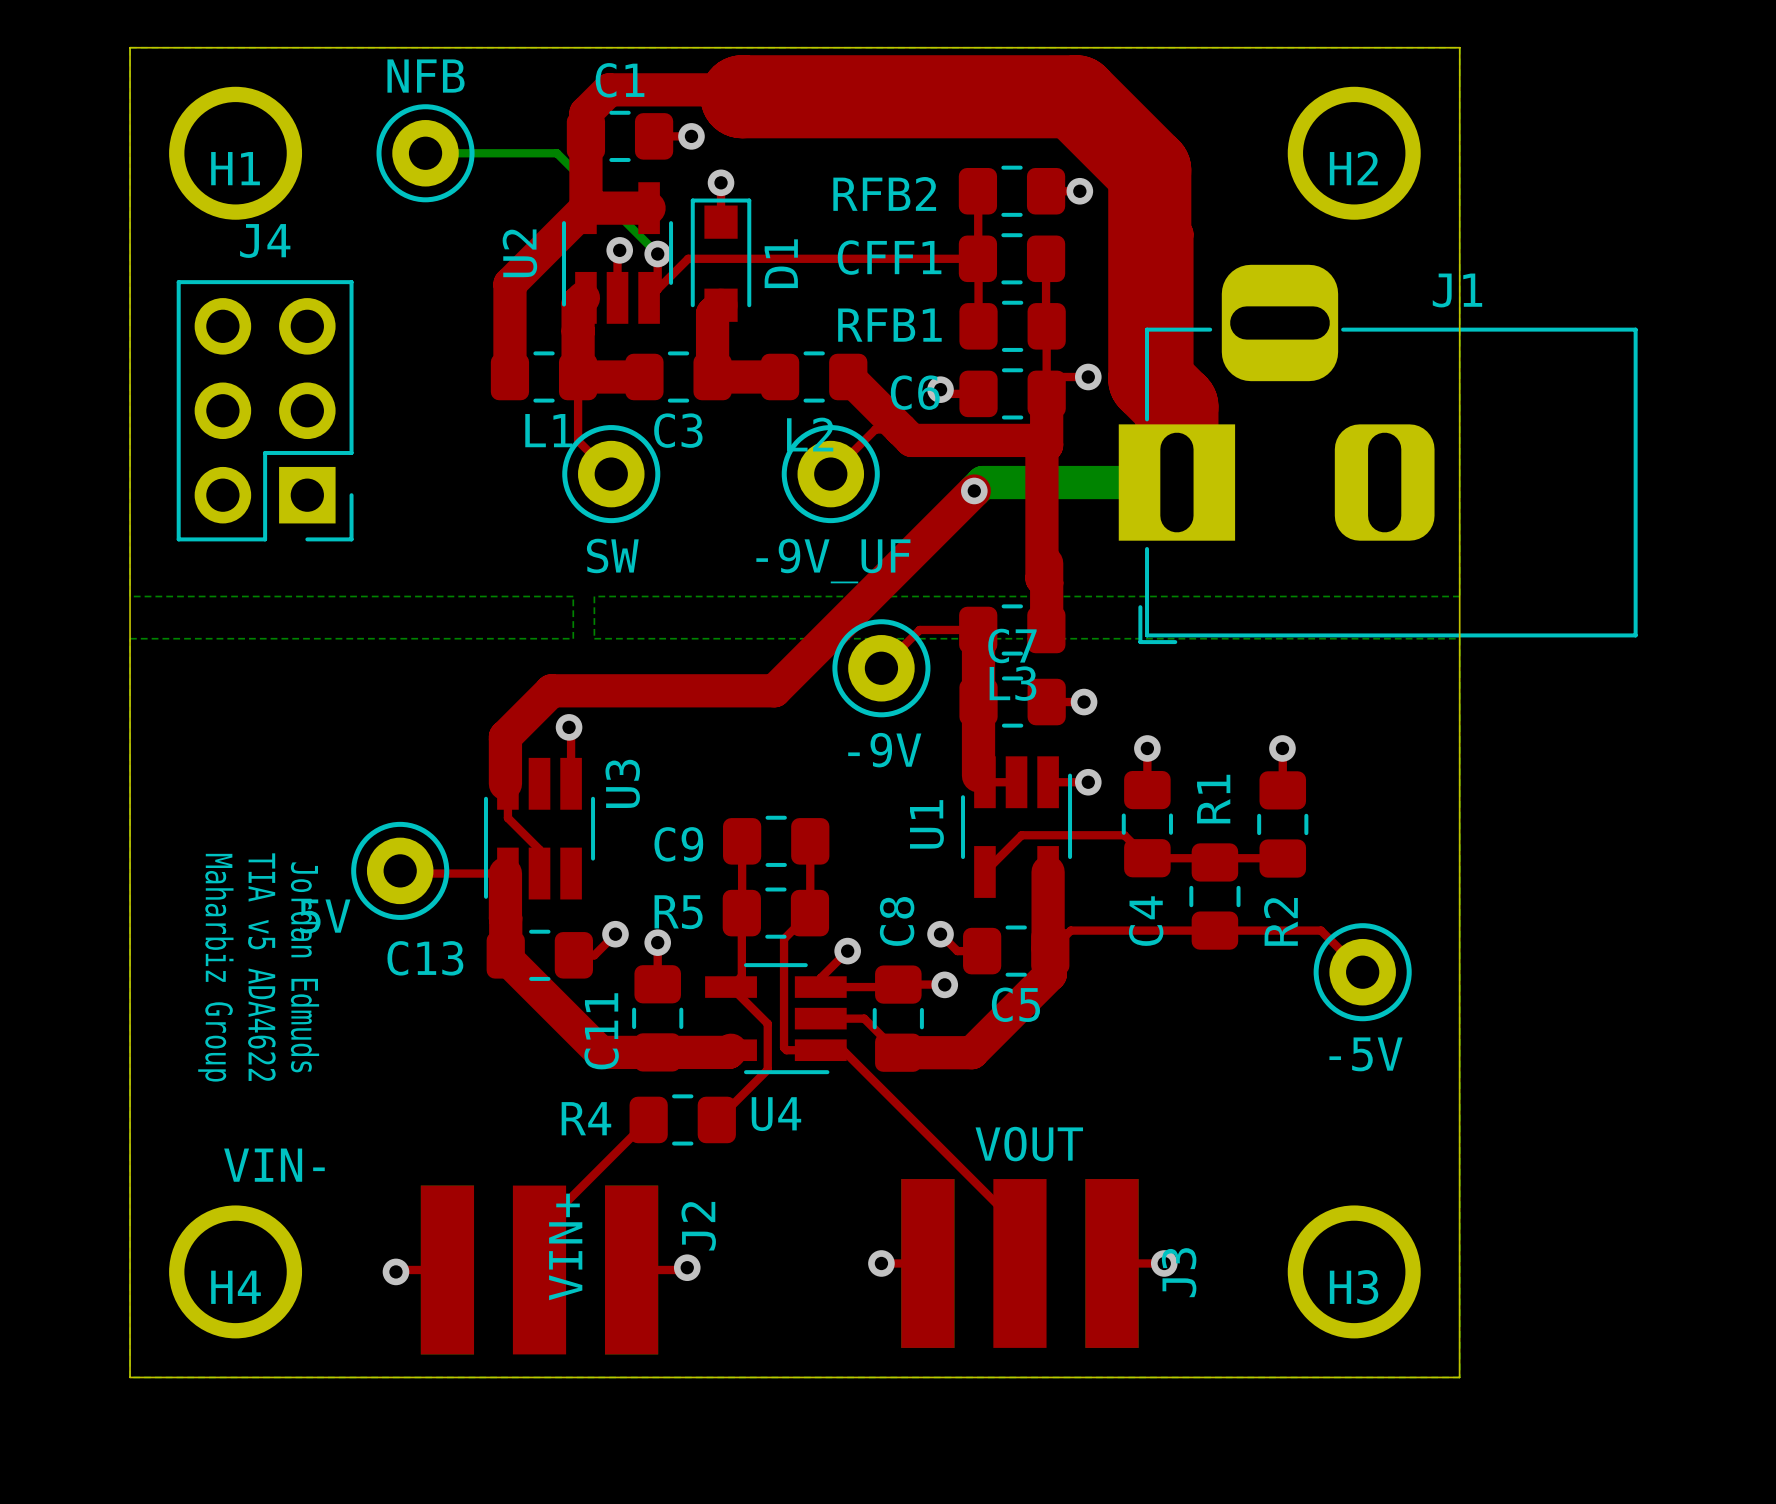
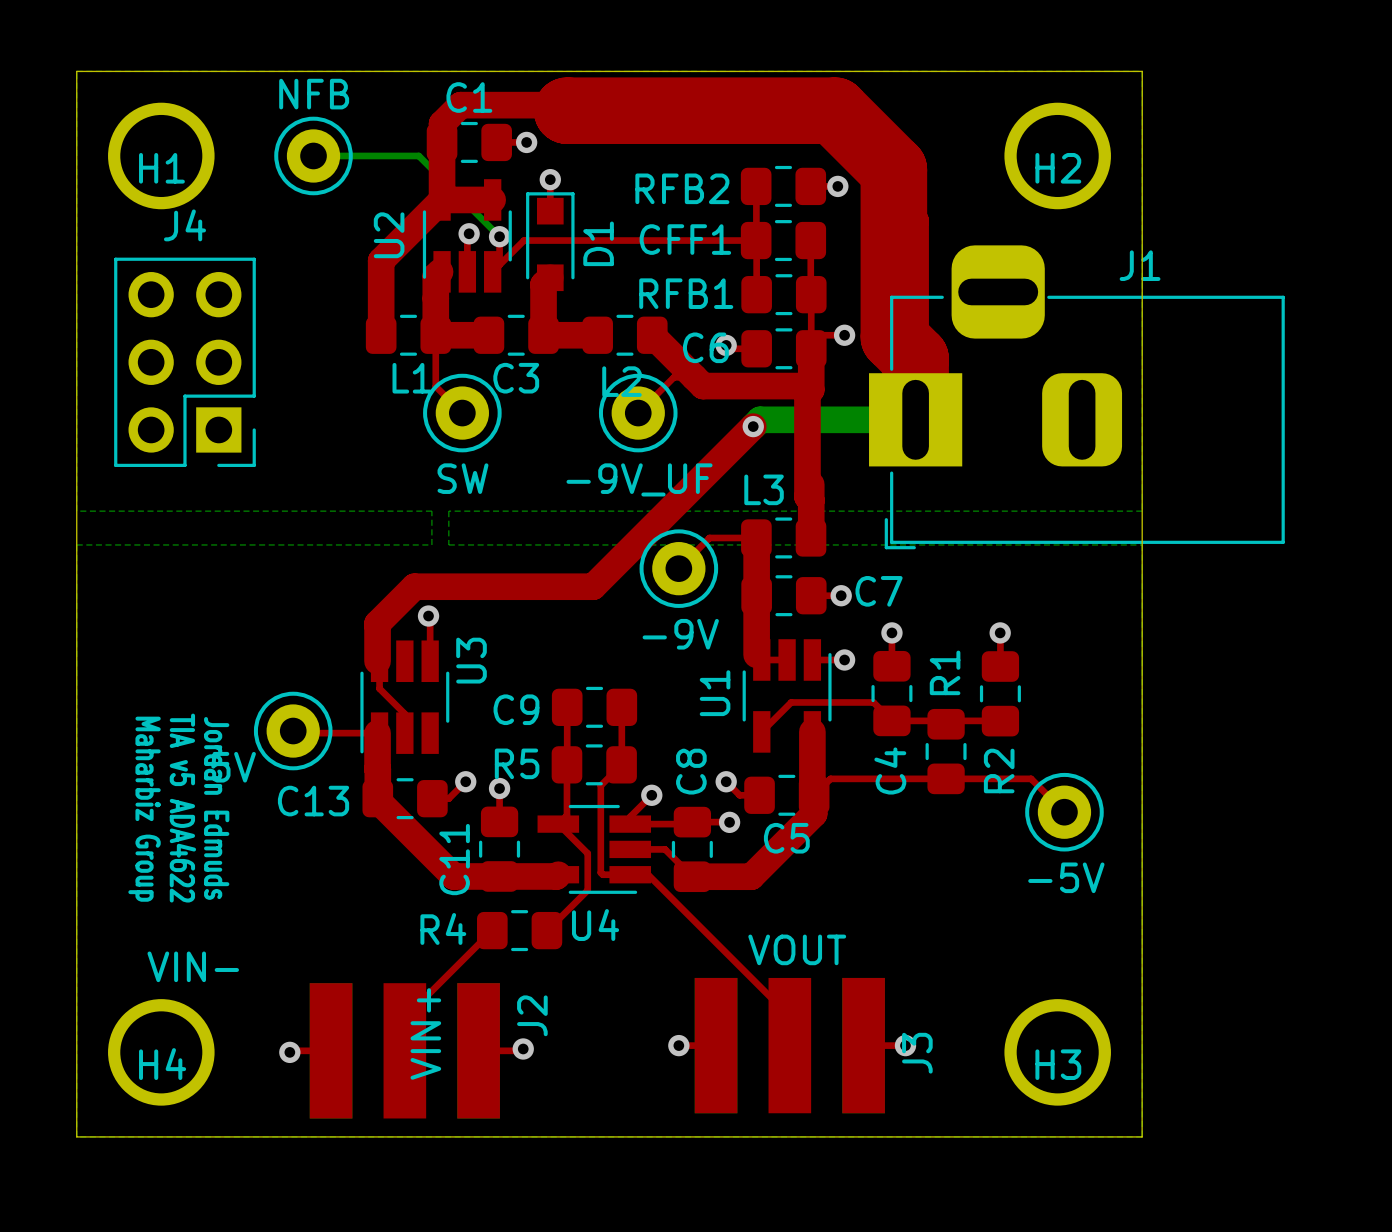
C7 name position: C7 (1012, 645) -> C7 (879, 591)
L3 name position: L3 (1012, 683) -> L3 (764, 489)

